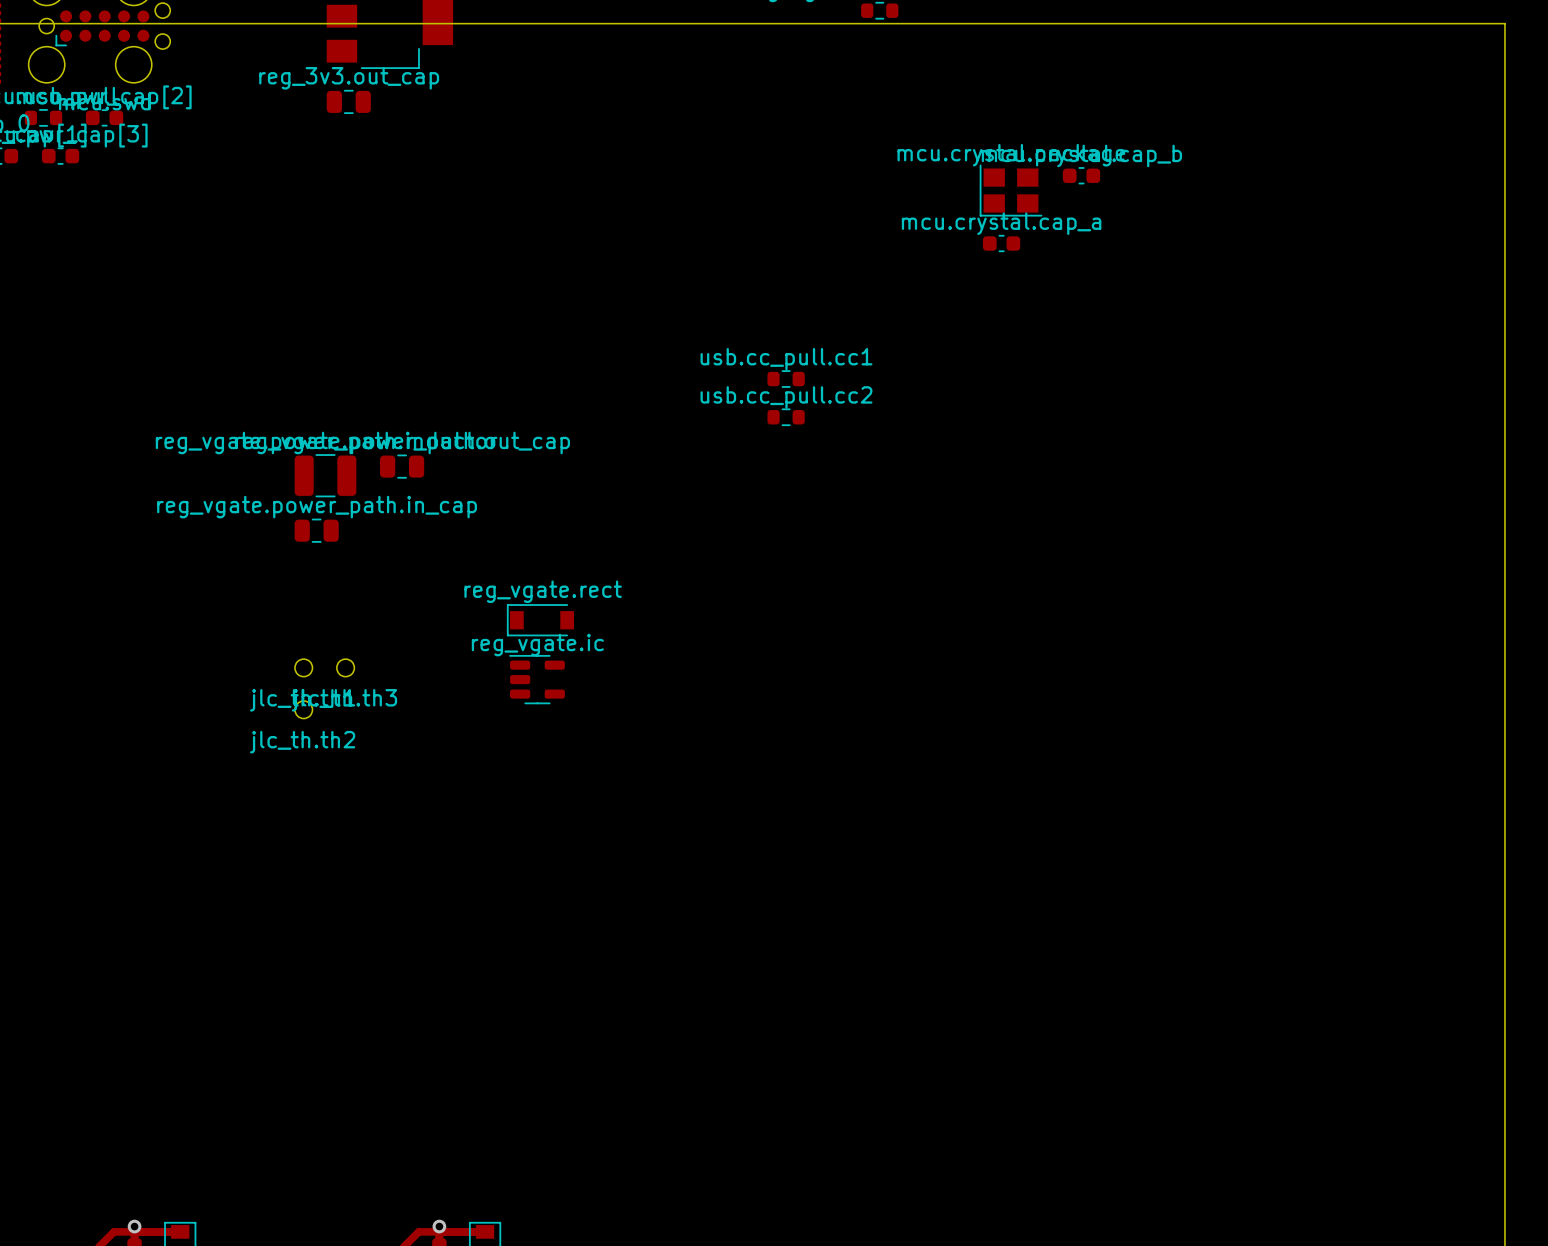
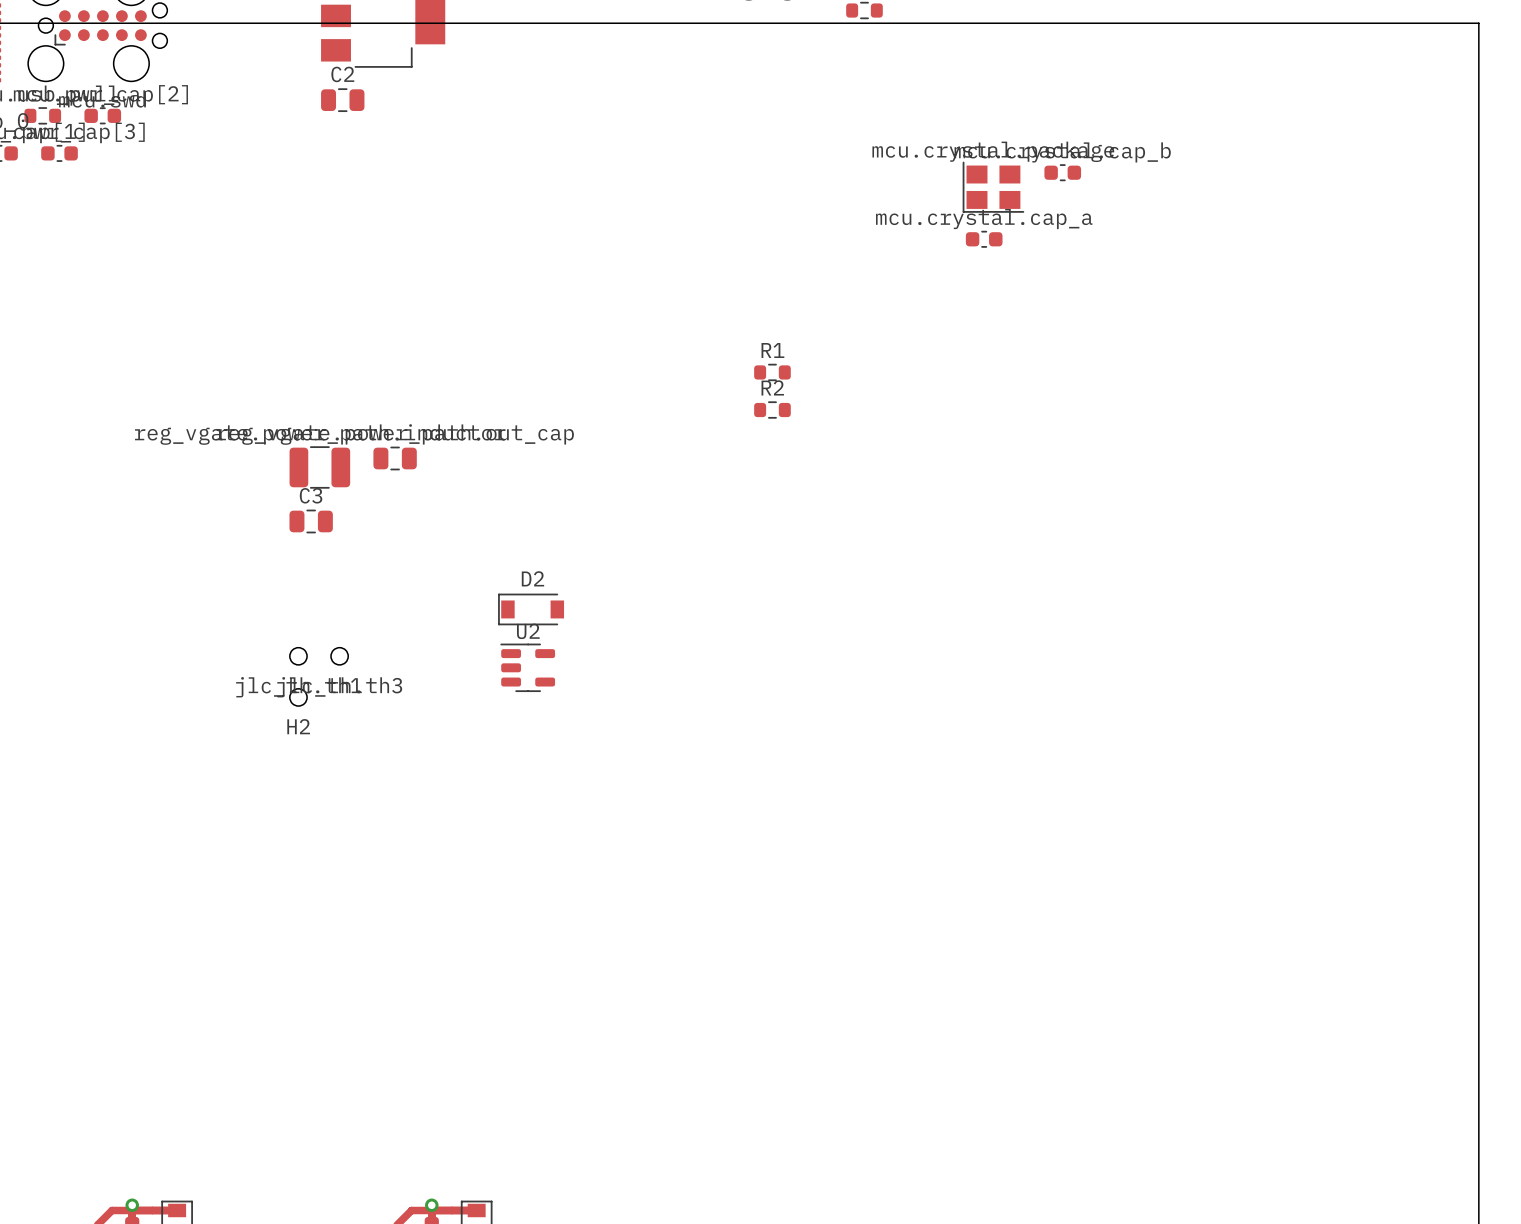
reg_3v3.out_cap name: reg_3v3.out_cap (349, 78) -> C2 (342, 74)
usb.cc_pull.cc1 name: usb.cc_pull.cc1 (786, 359) -> R1 (772, 350)
usb.cc_pull.cc2 name: usb.cc_pull.cc2 (786, 397) -> R2 (772, 387)
reg_vgate.power_path.in_cap name: reg_vgate.power_path.in_cap (317, 507) -> C3 (311, 495)
reg_vgate.rect name: reg_vgate.rect (543, 591) -> D2 (532, 578)
reg_vgate.ic name: reg_vgate.ic (537, 645) -> U2 (528, 631)
jlc_th.th2 name: jlc_th.th2 (302, 742) -> H2 (298, 726)

